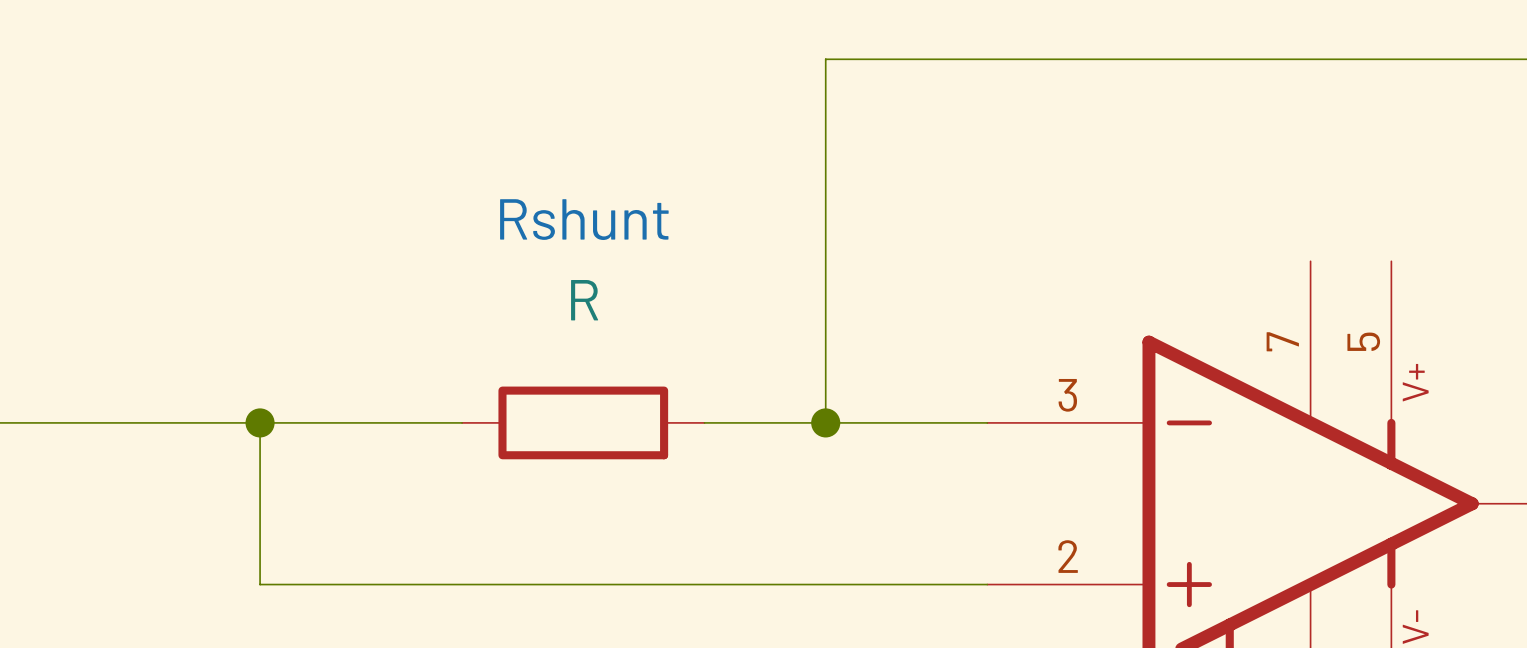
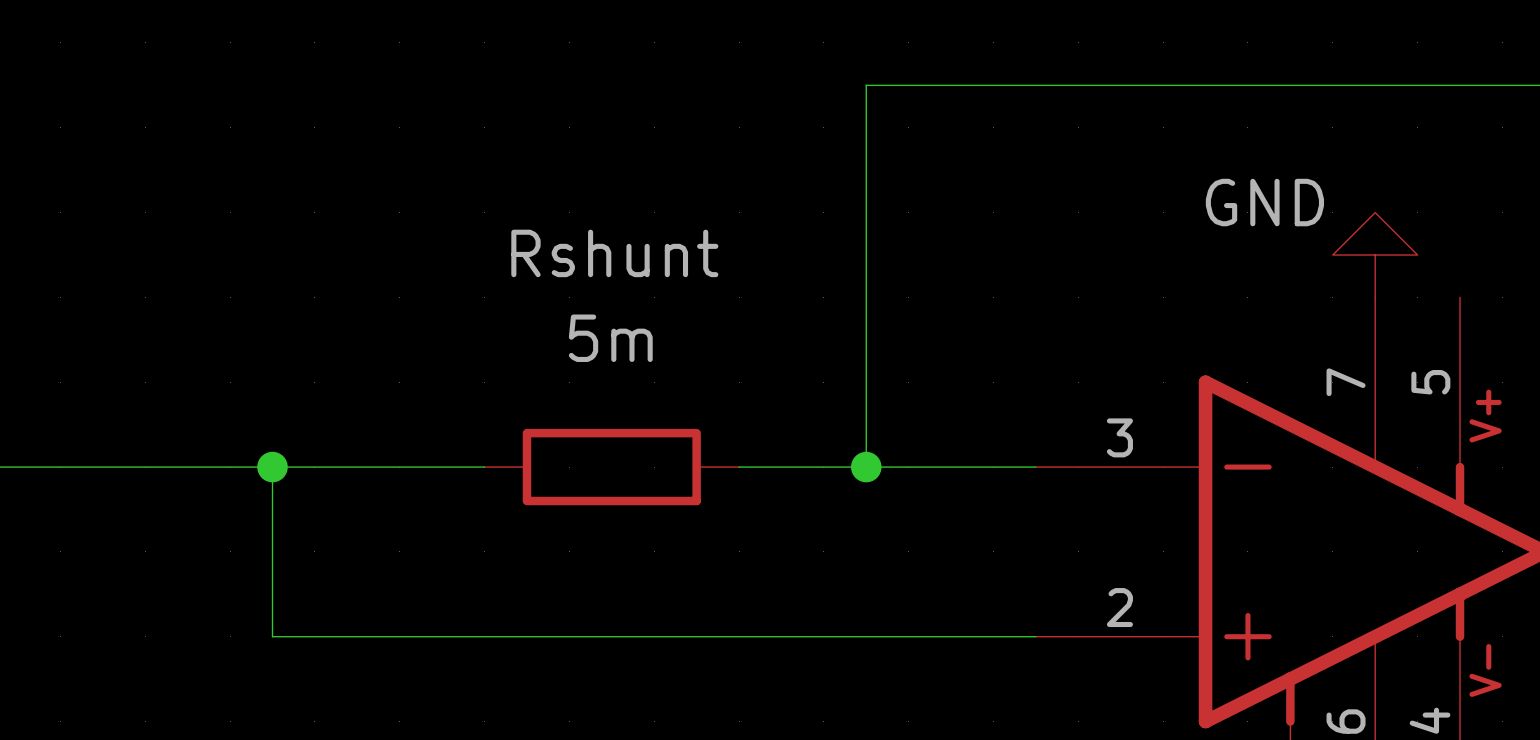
power symbol: none -> GND (1375, 255)
Rshunt value: R (584, 300) -> 5m (610, 338)

